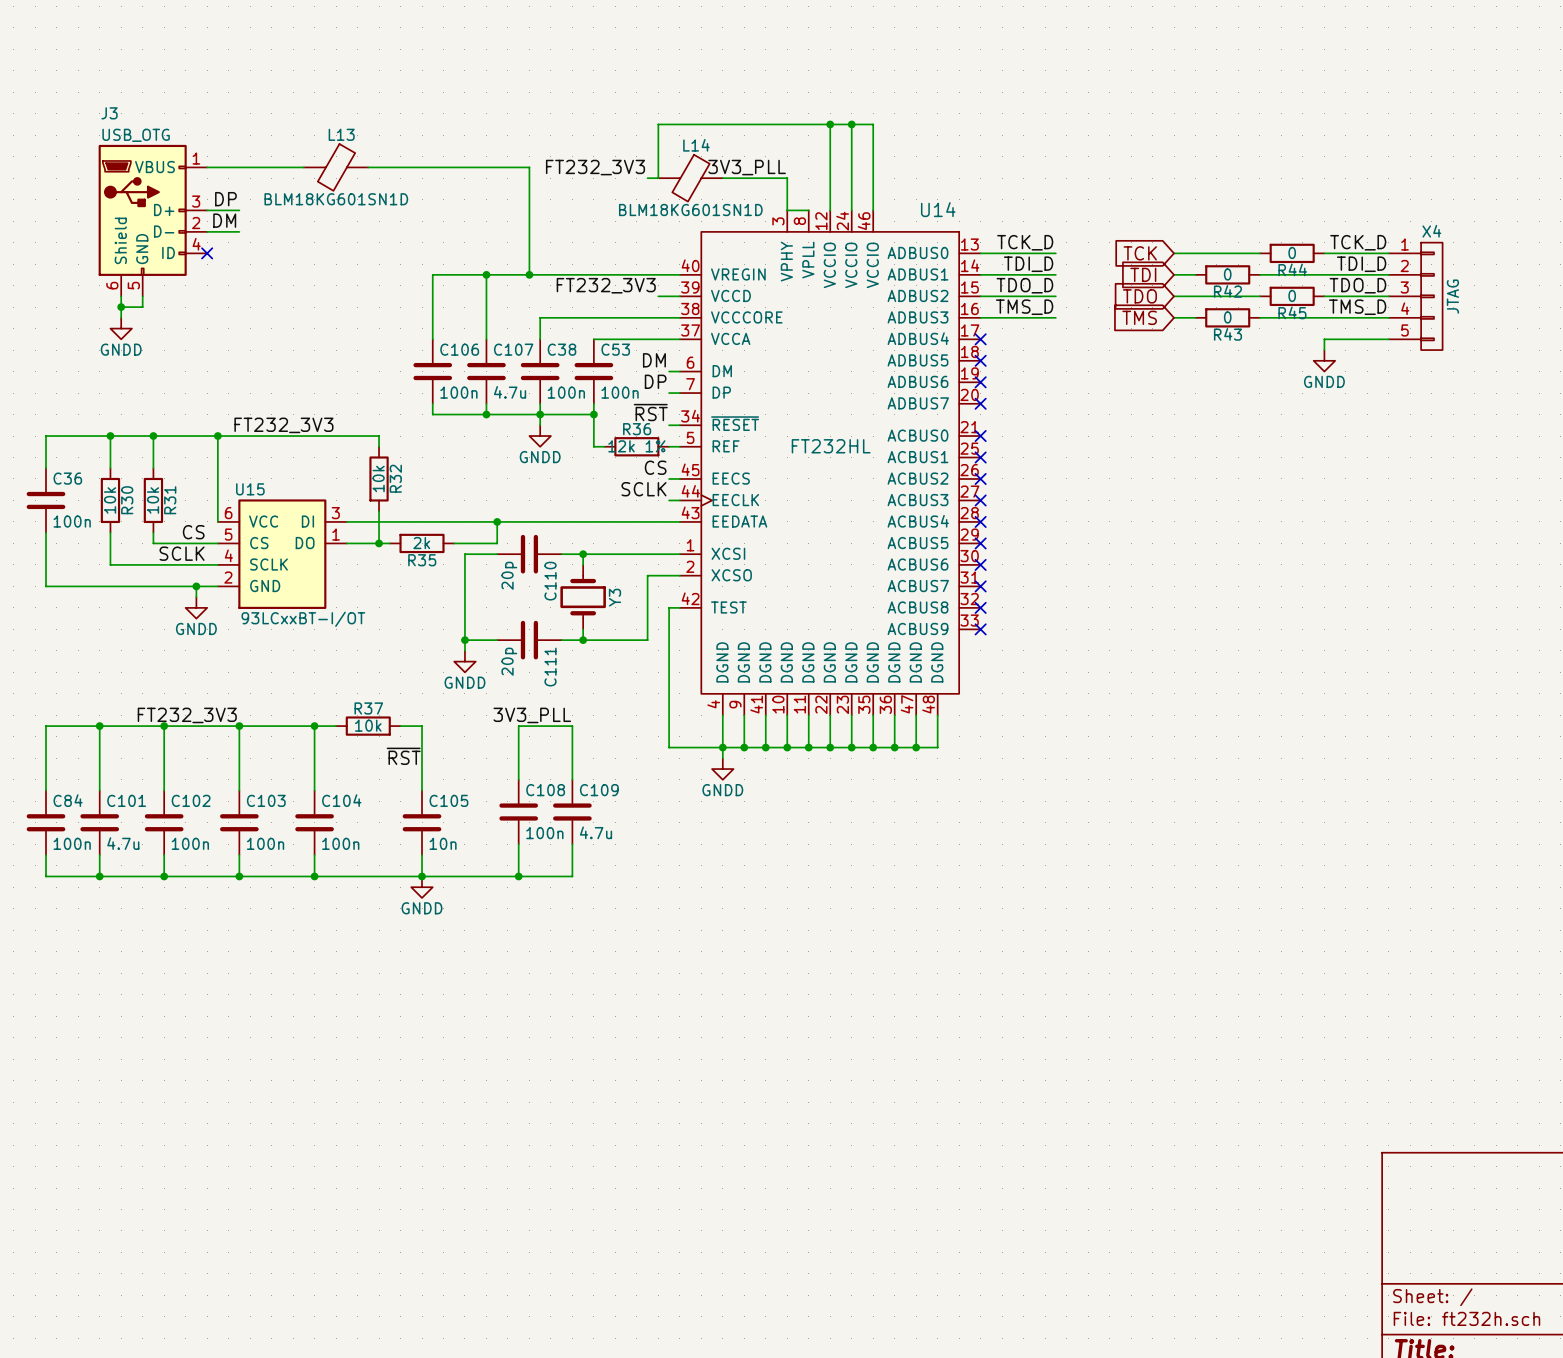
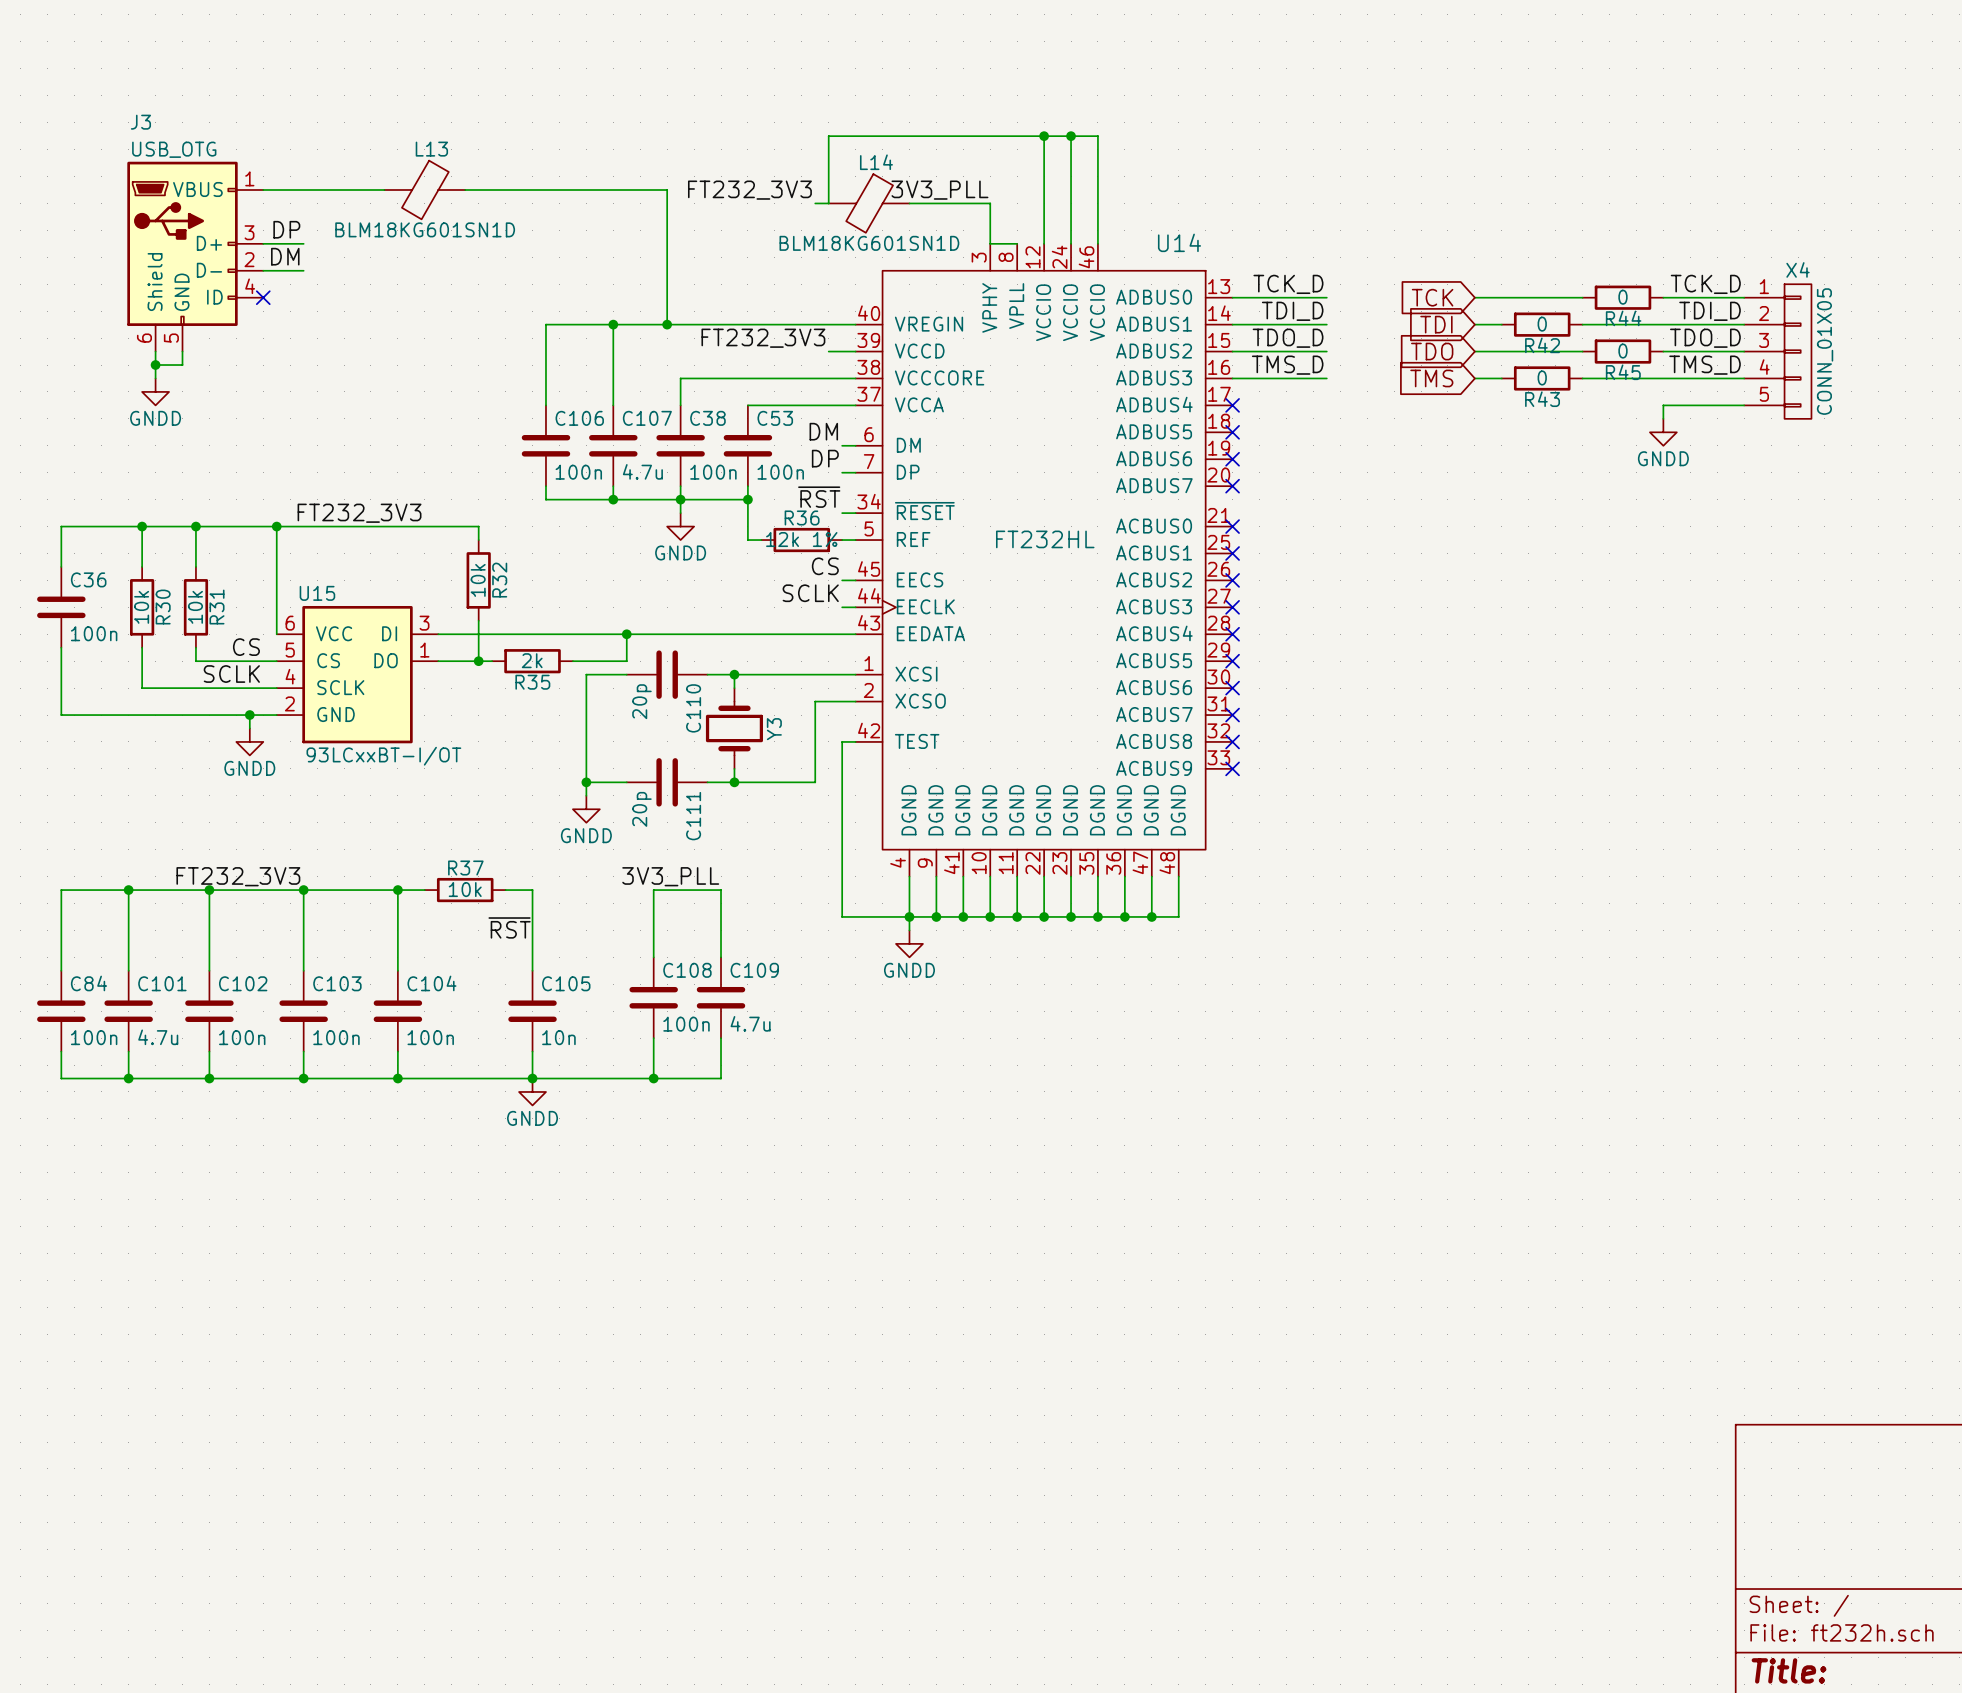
X4 value: JTAG (1452, 296) -> CONN_01X05 (1825, 351)

